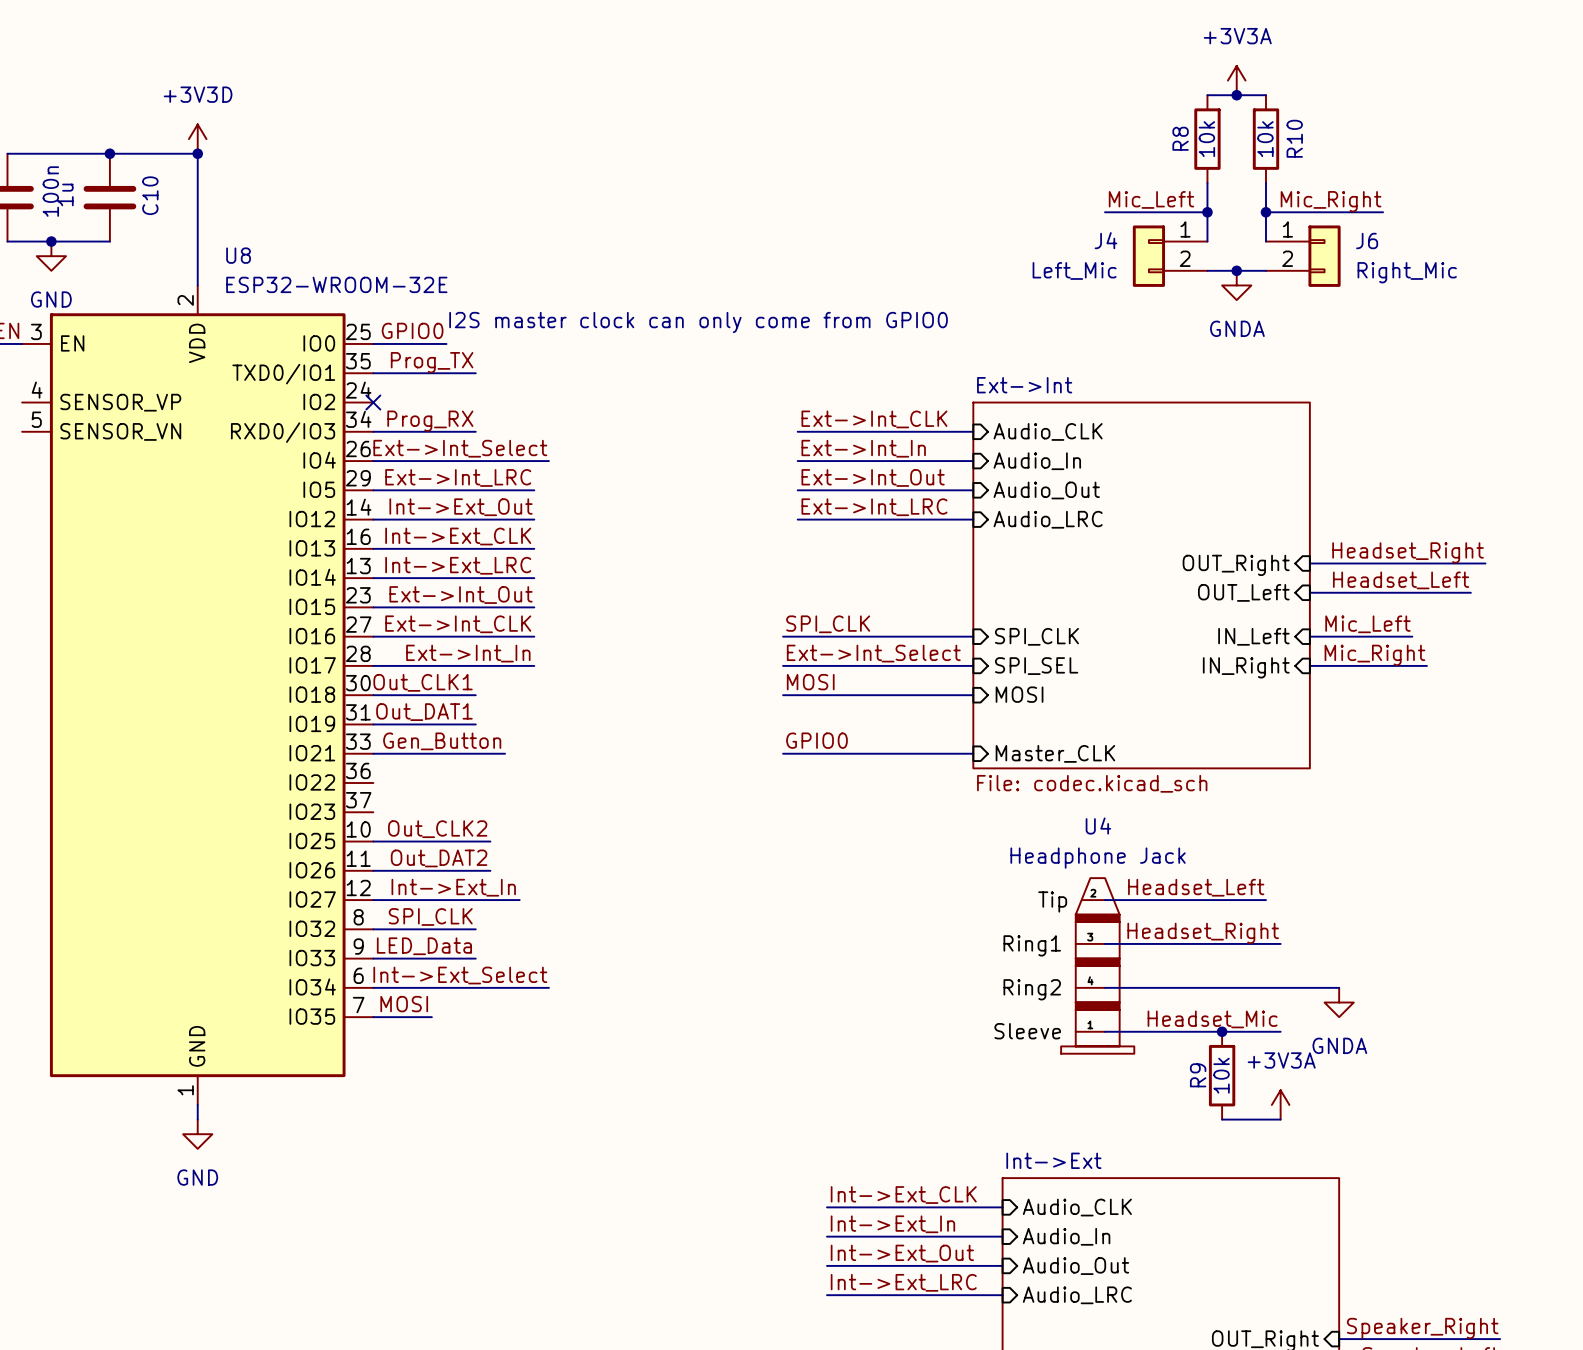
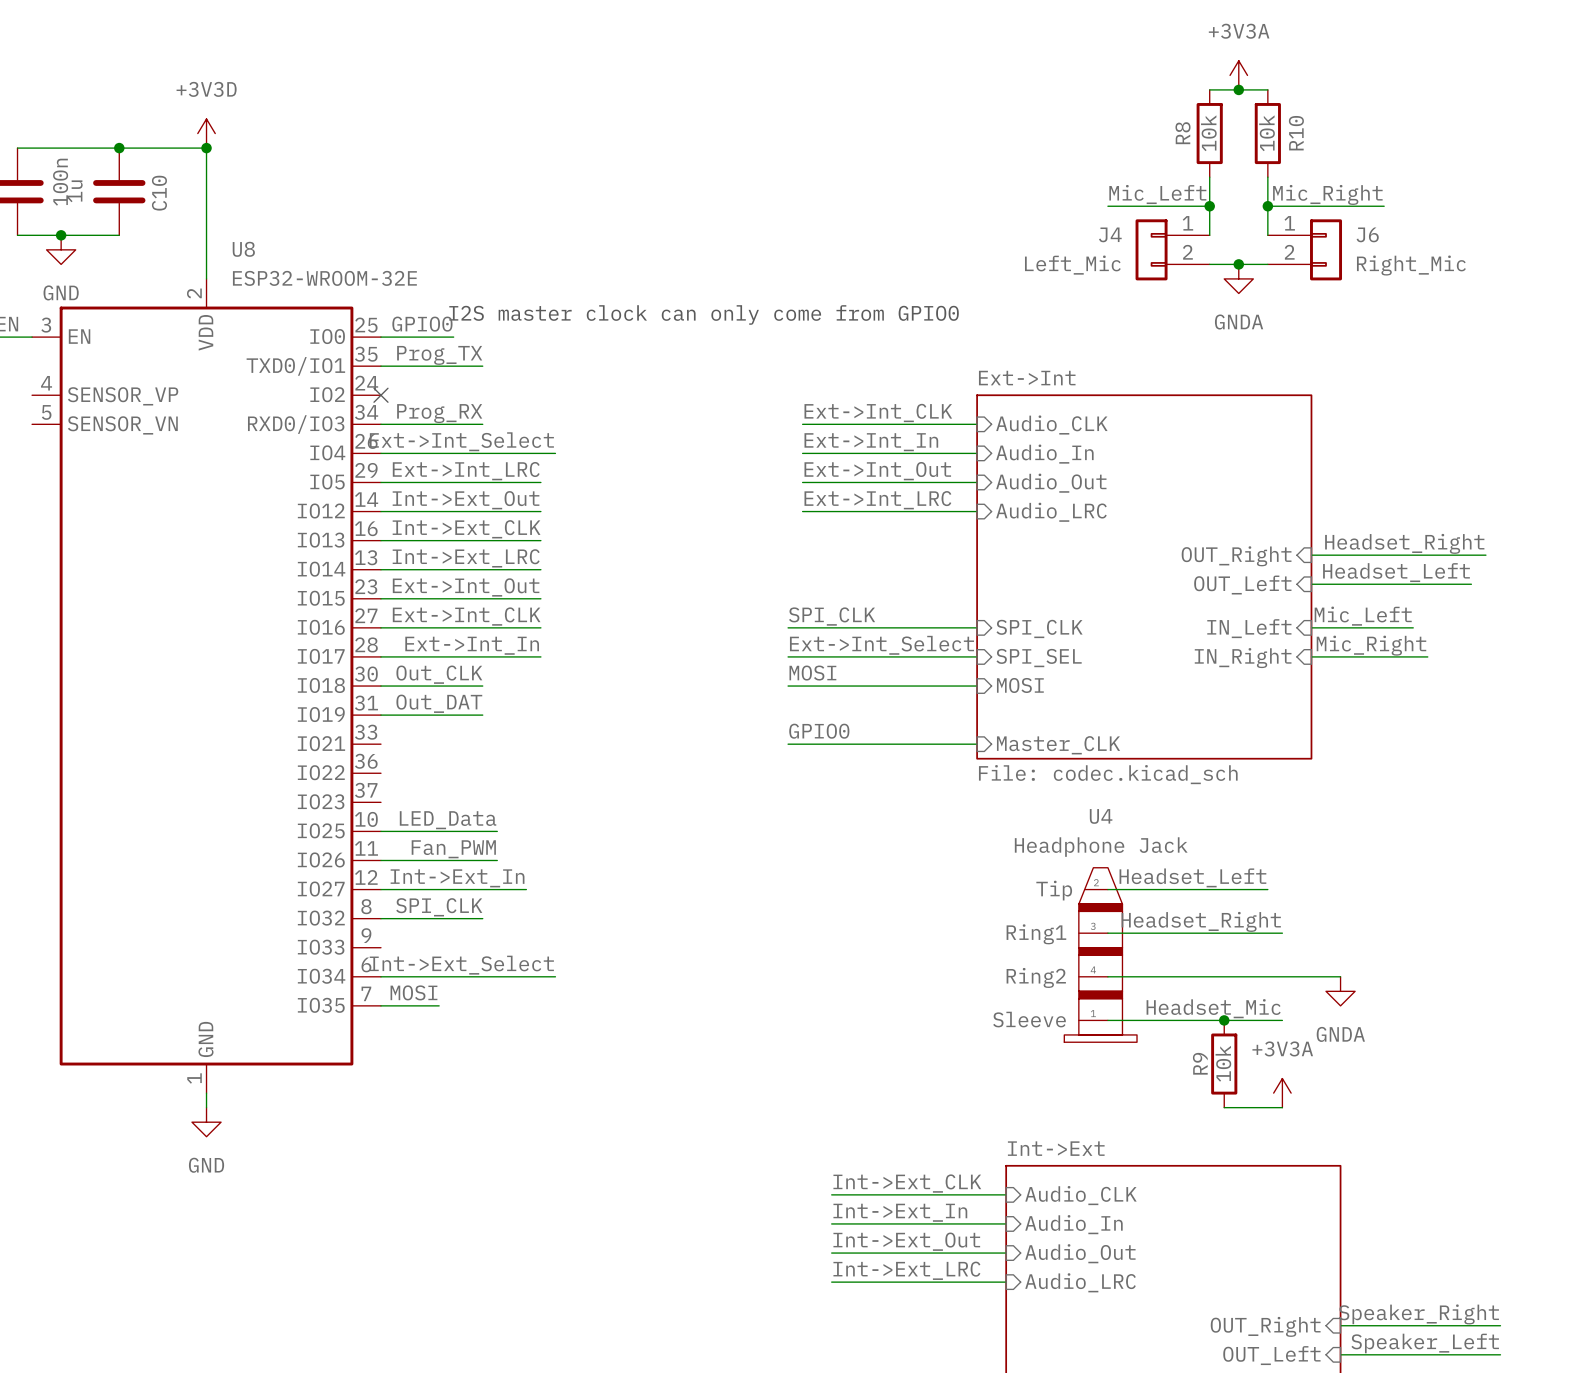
label: Out_CLK1 (423, 682) -> Out_CLK (439, 674)
label: Out_DAT1 (424, 712) -> Out_DAT (439, 703)
label: Gen_Button (442, 741) -> none
wire: (373, 753) (505, 753) -> none
label: Out_CLK2 (437, 829) -> LED_Data (448, 820)
label: Out_DAT2 (439, 858) -> Fan_PWM (453, 849)
label: LED_Data (424, 946) -> none
wire: (373, 958) (475, 958) -> none

